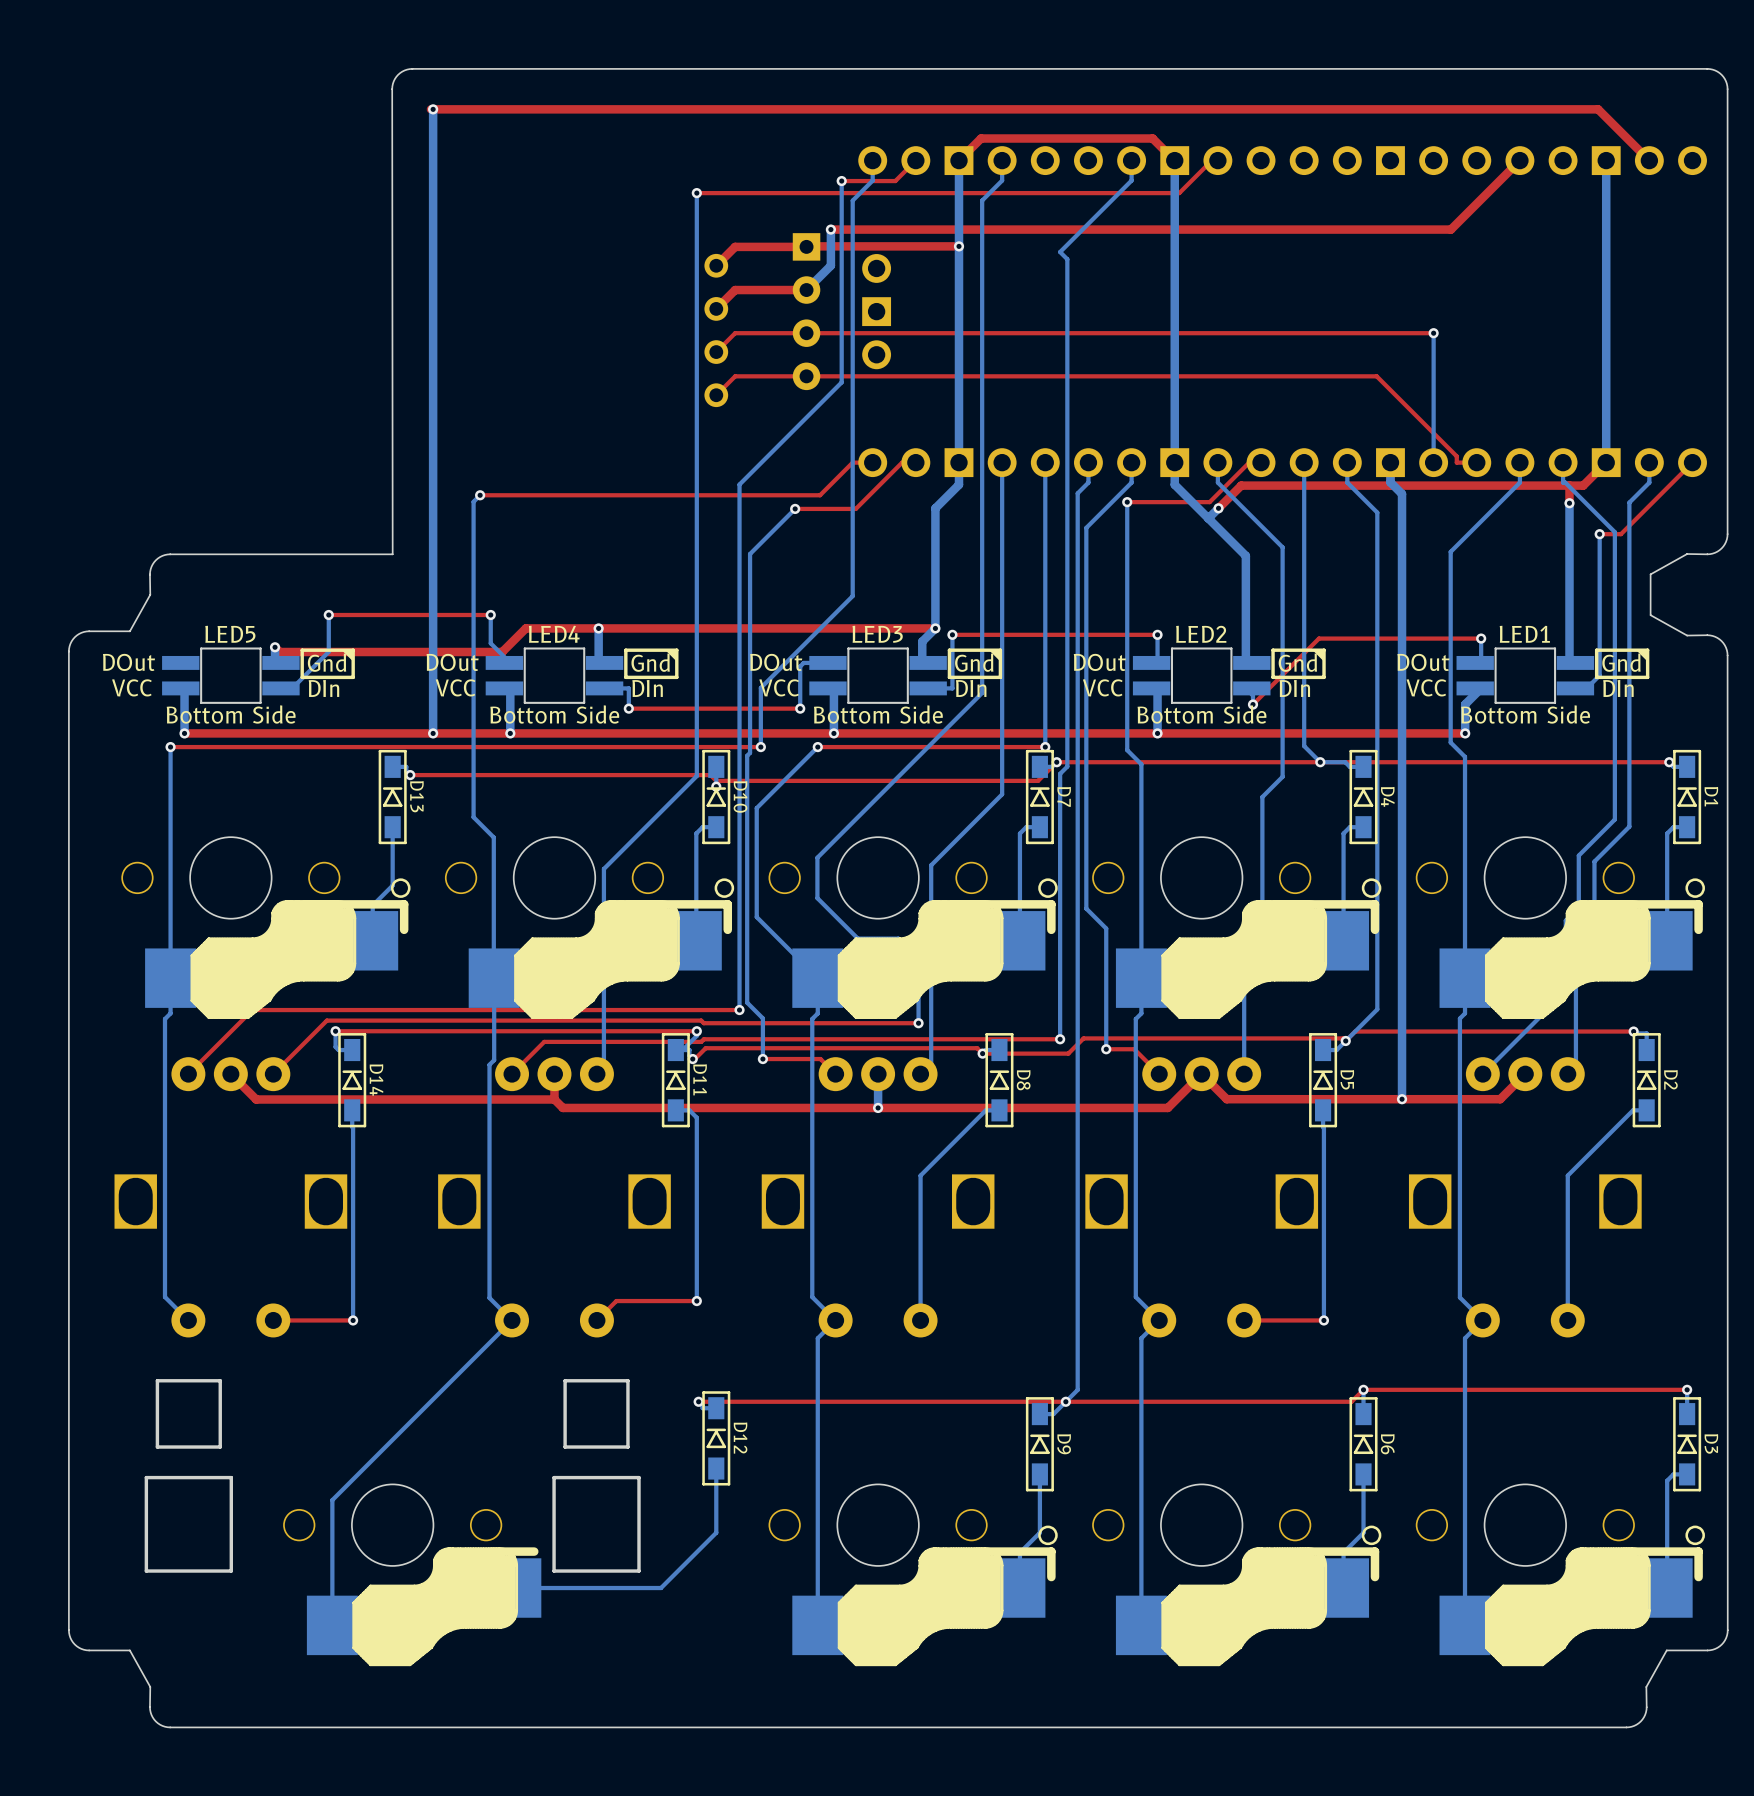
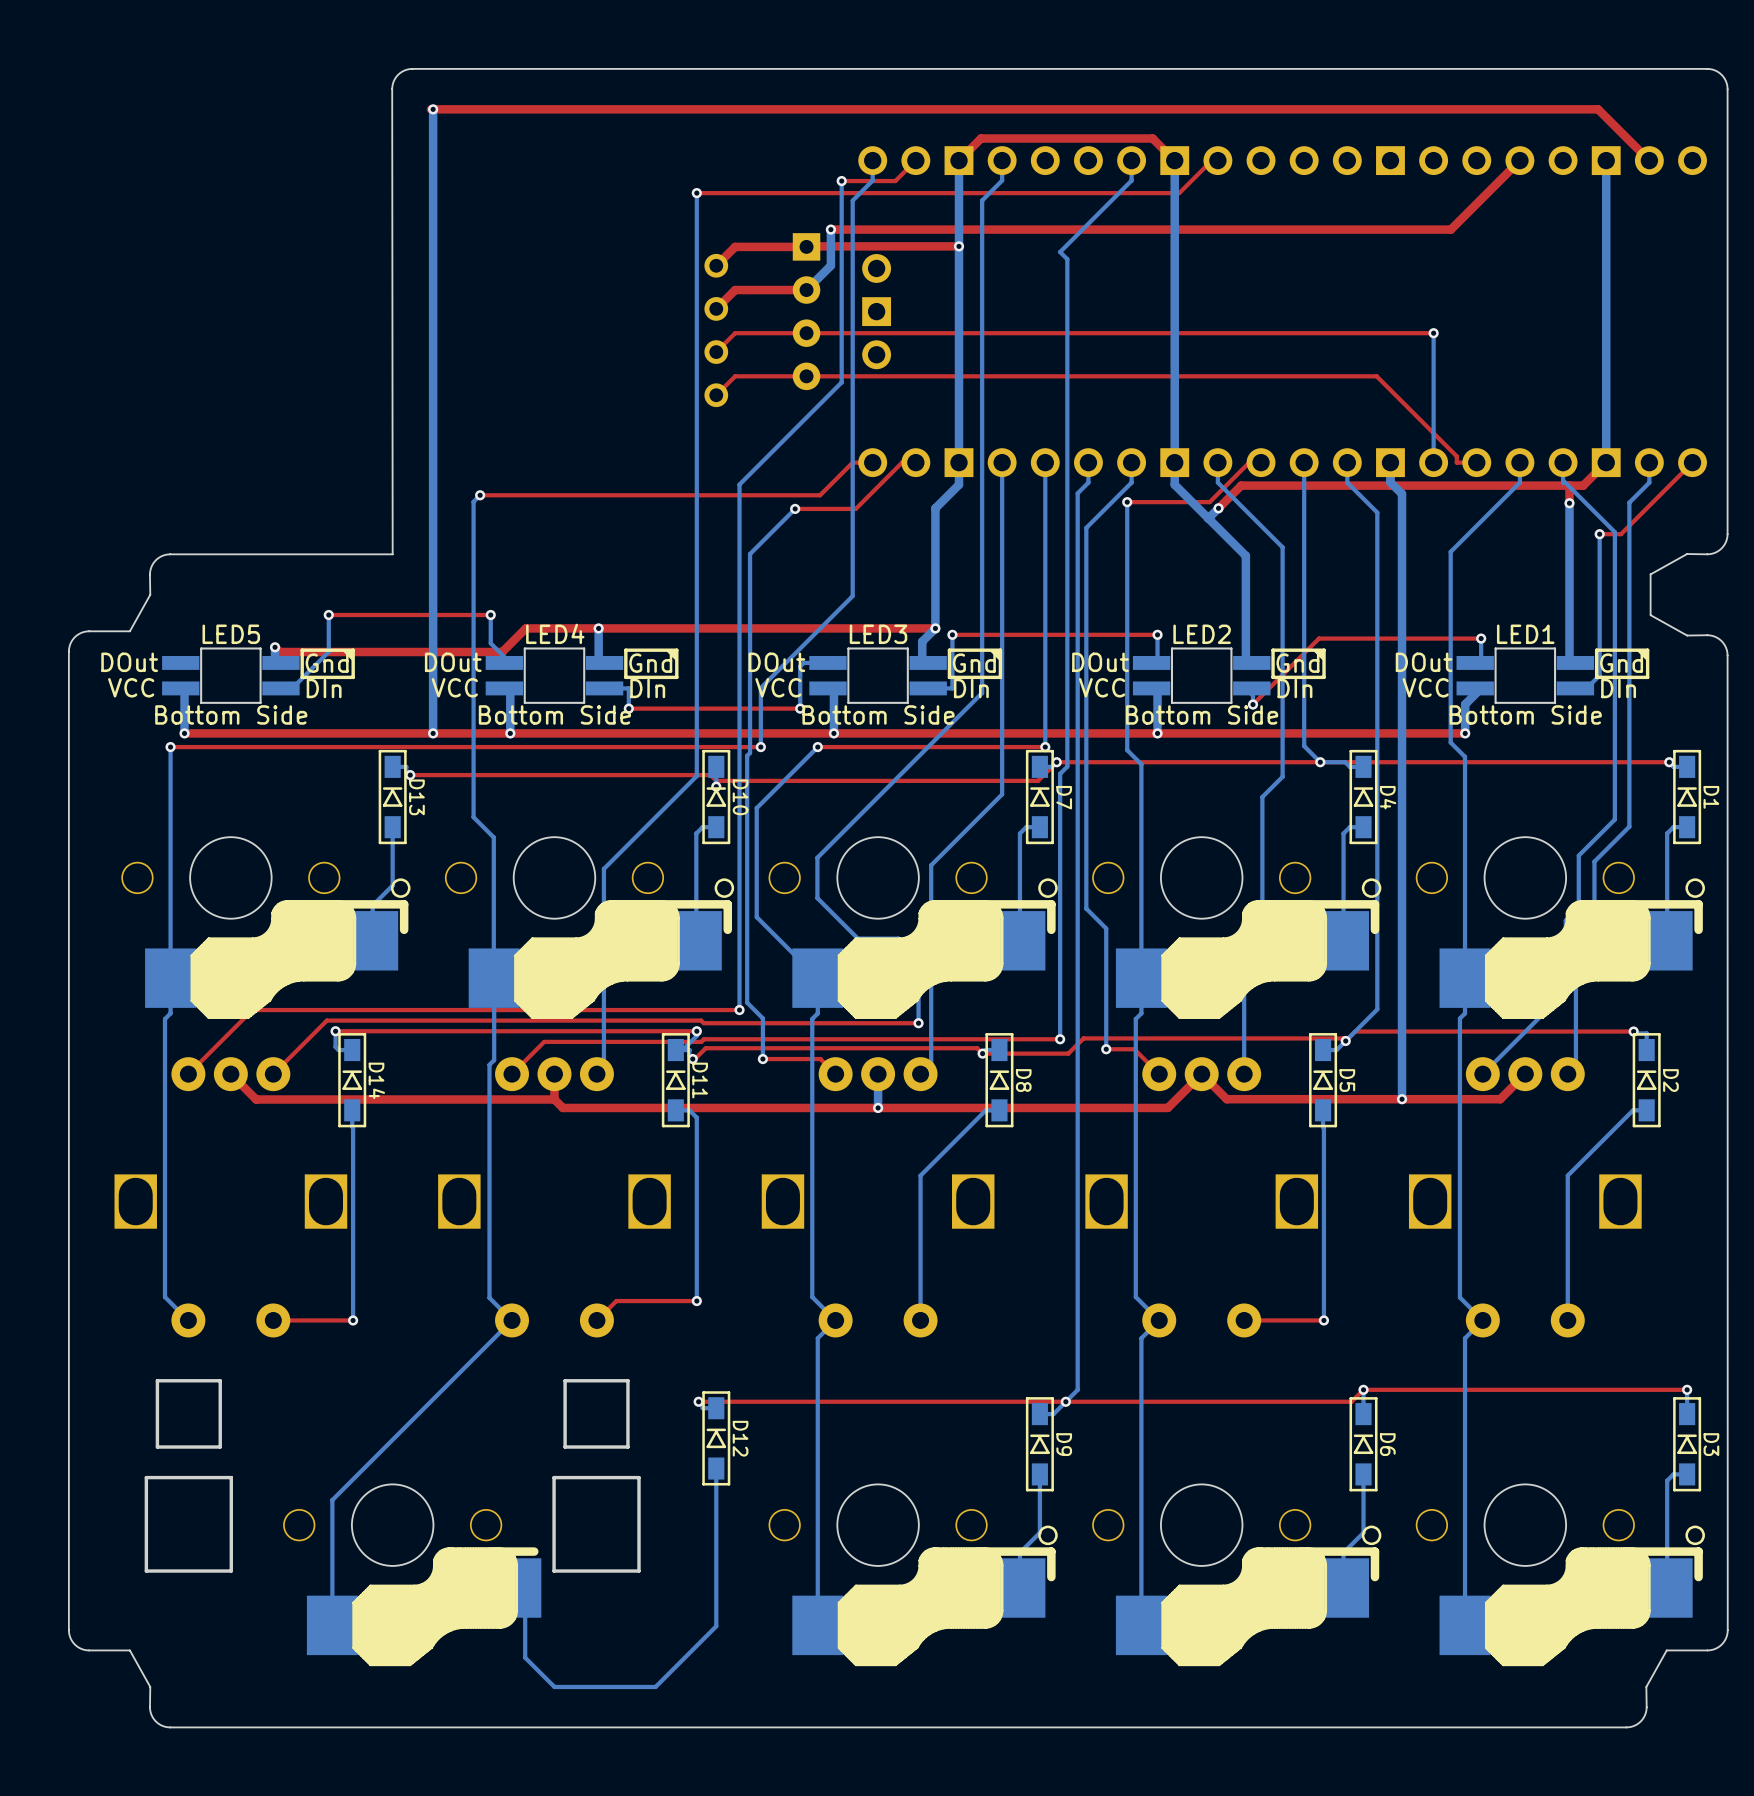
bottom track: (716, 1532) (661, 1588) (525, 1588) -> (716, 1532) (716, 1626) (655, 1686) (554, 1686) (525, 1657) (525, 1588)

